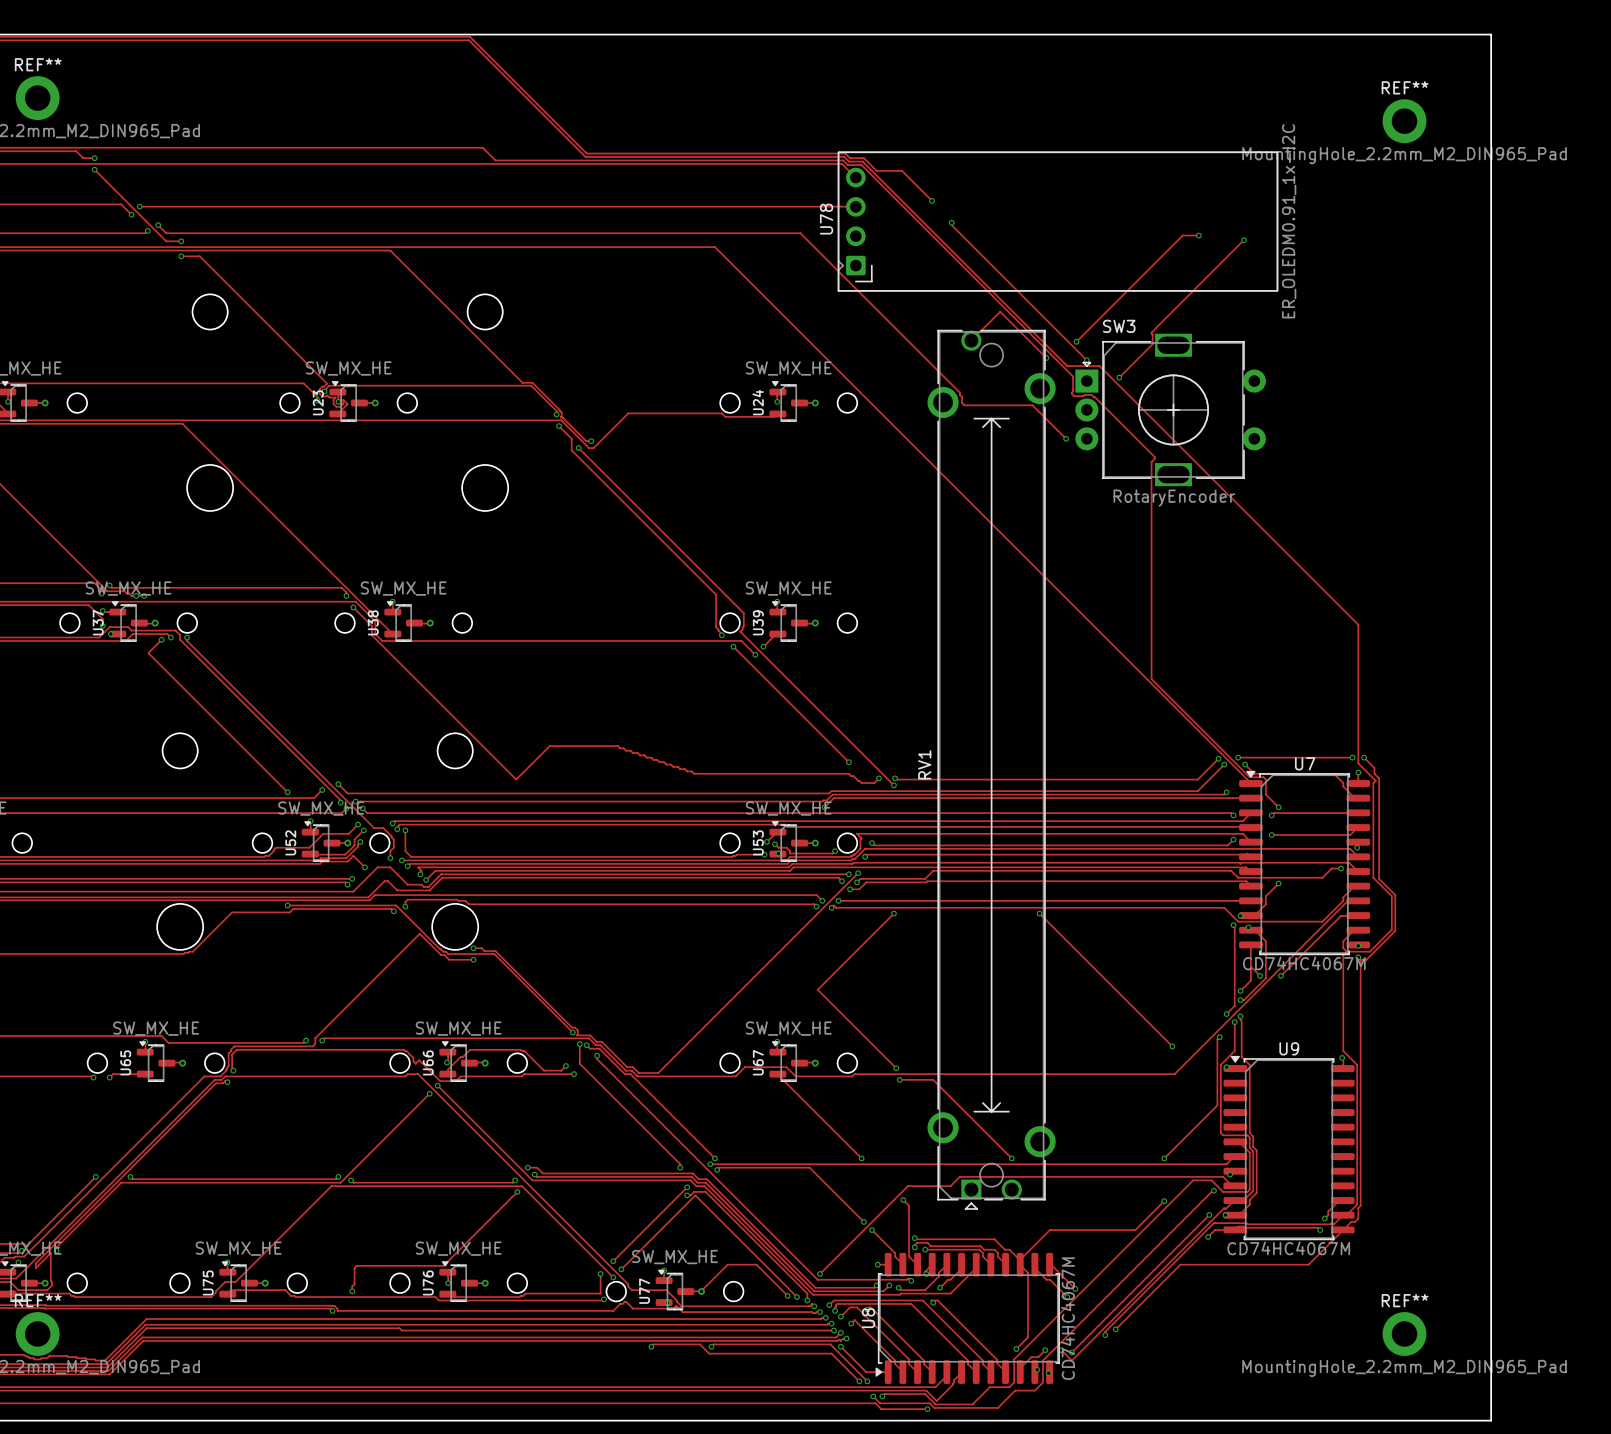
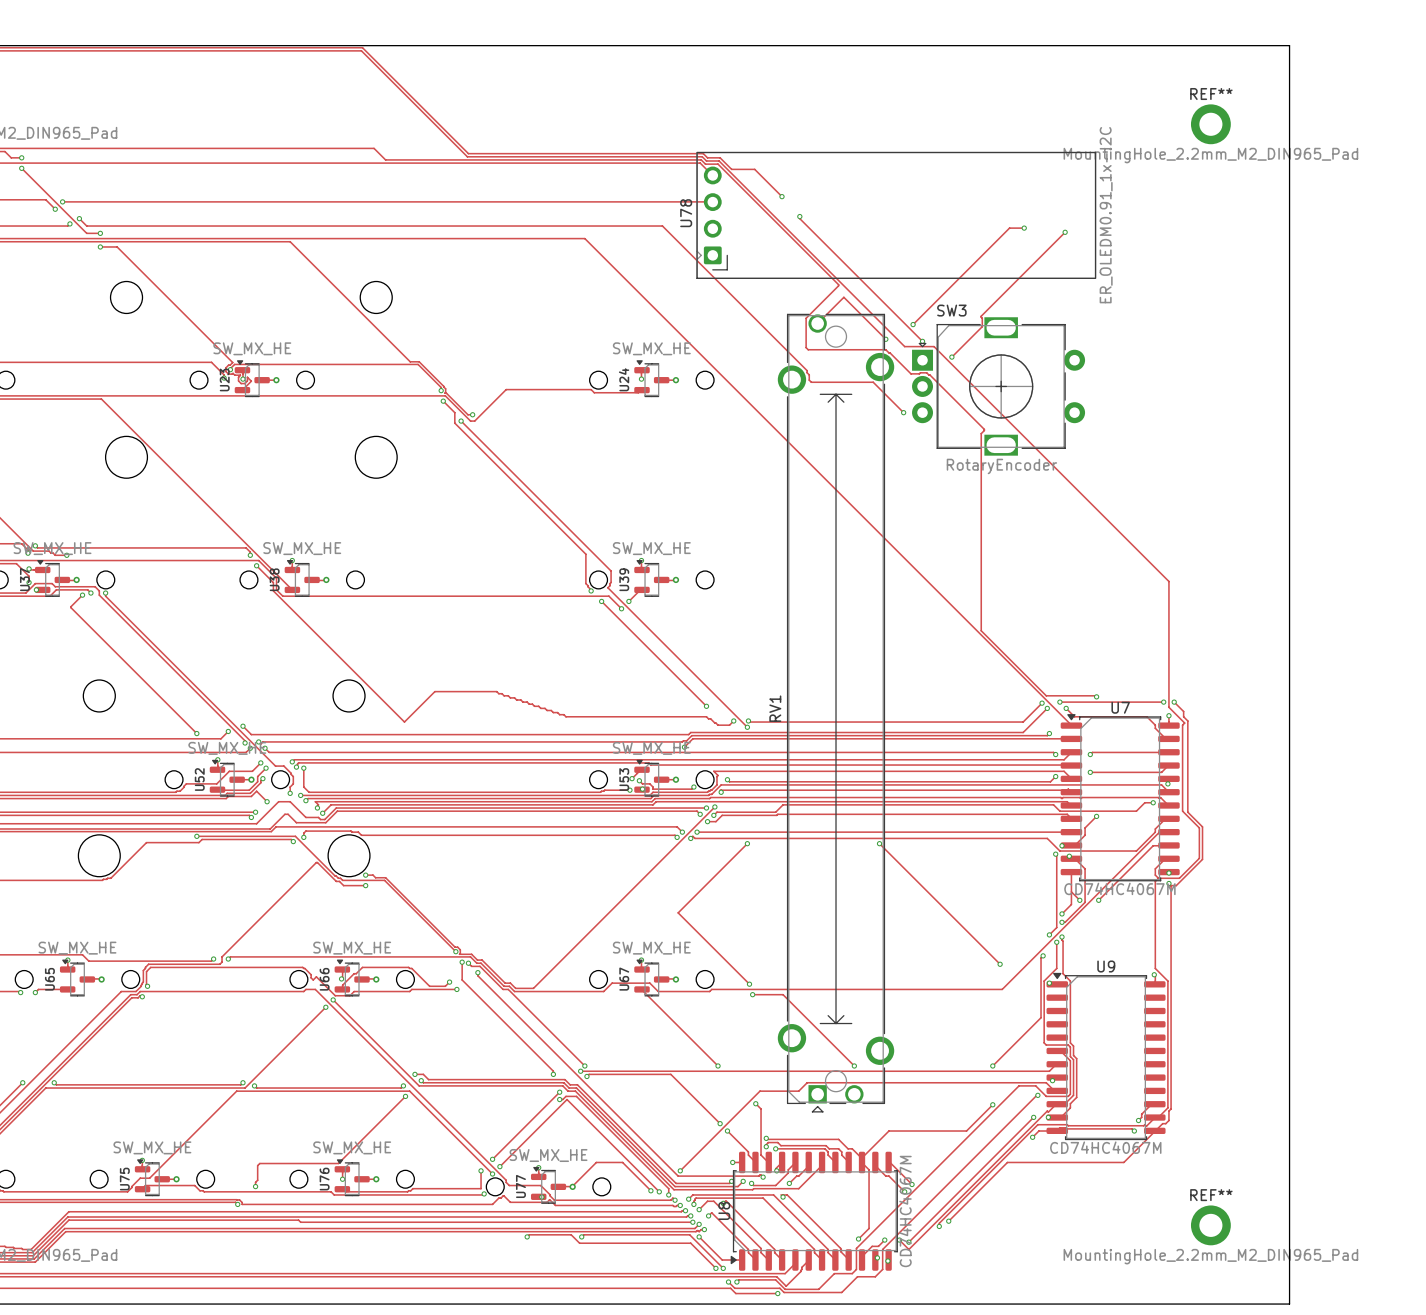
track: (994, 297) (1073, 376) (1071, 393) -> (838, 284) (806, 318) (806, 347) (808, 349) (885, 349) (908, 371)
via: (136, 595) -> none
track: (1223, 750) (1249, 777) (1263, 777) (1265, 779) (1265, 794) (1278, 807) -> (1046, 695) (1096, 696)
via position: (1278, 807) -> (1096, 696)

